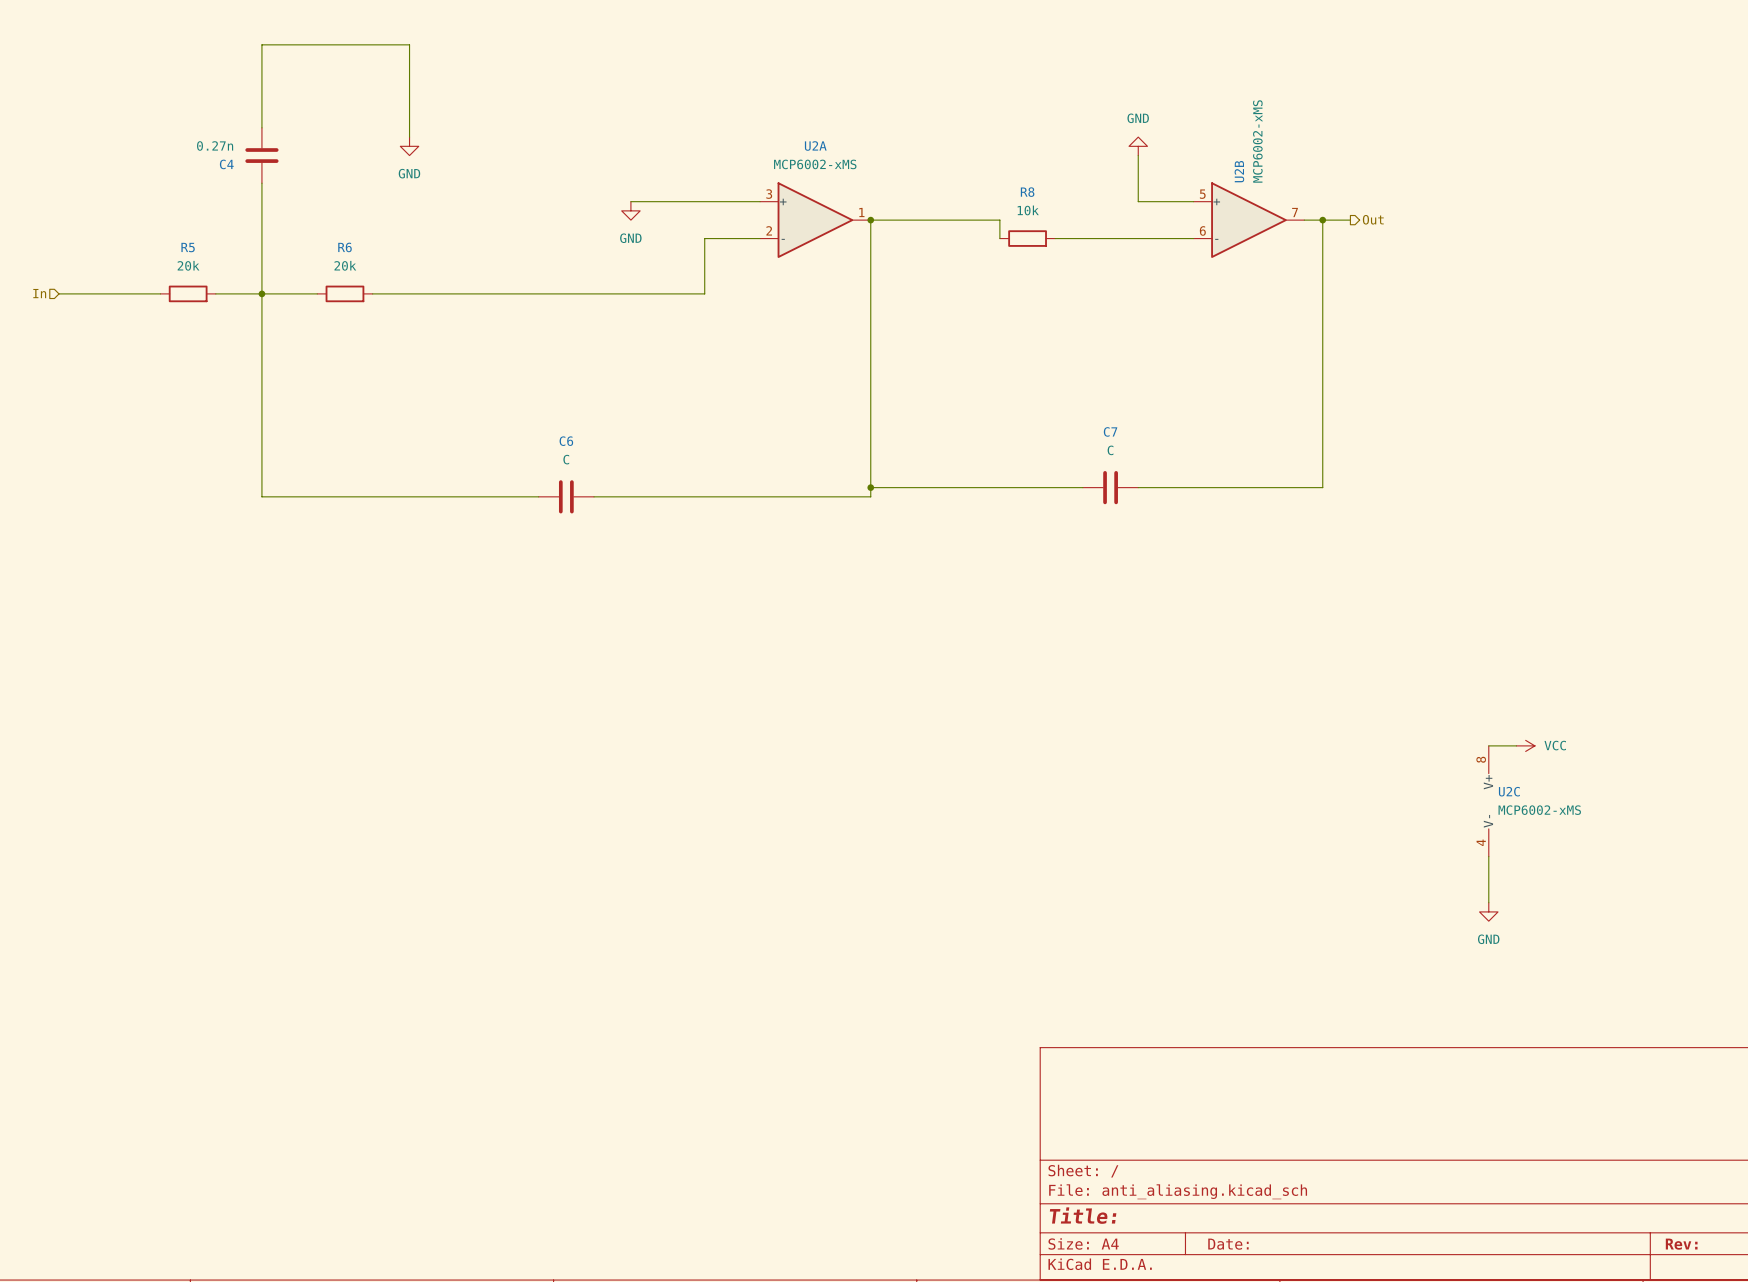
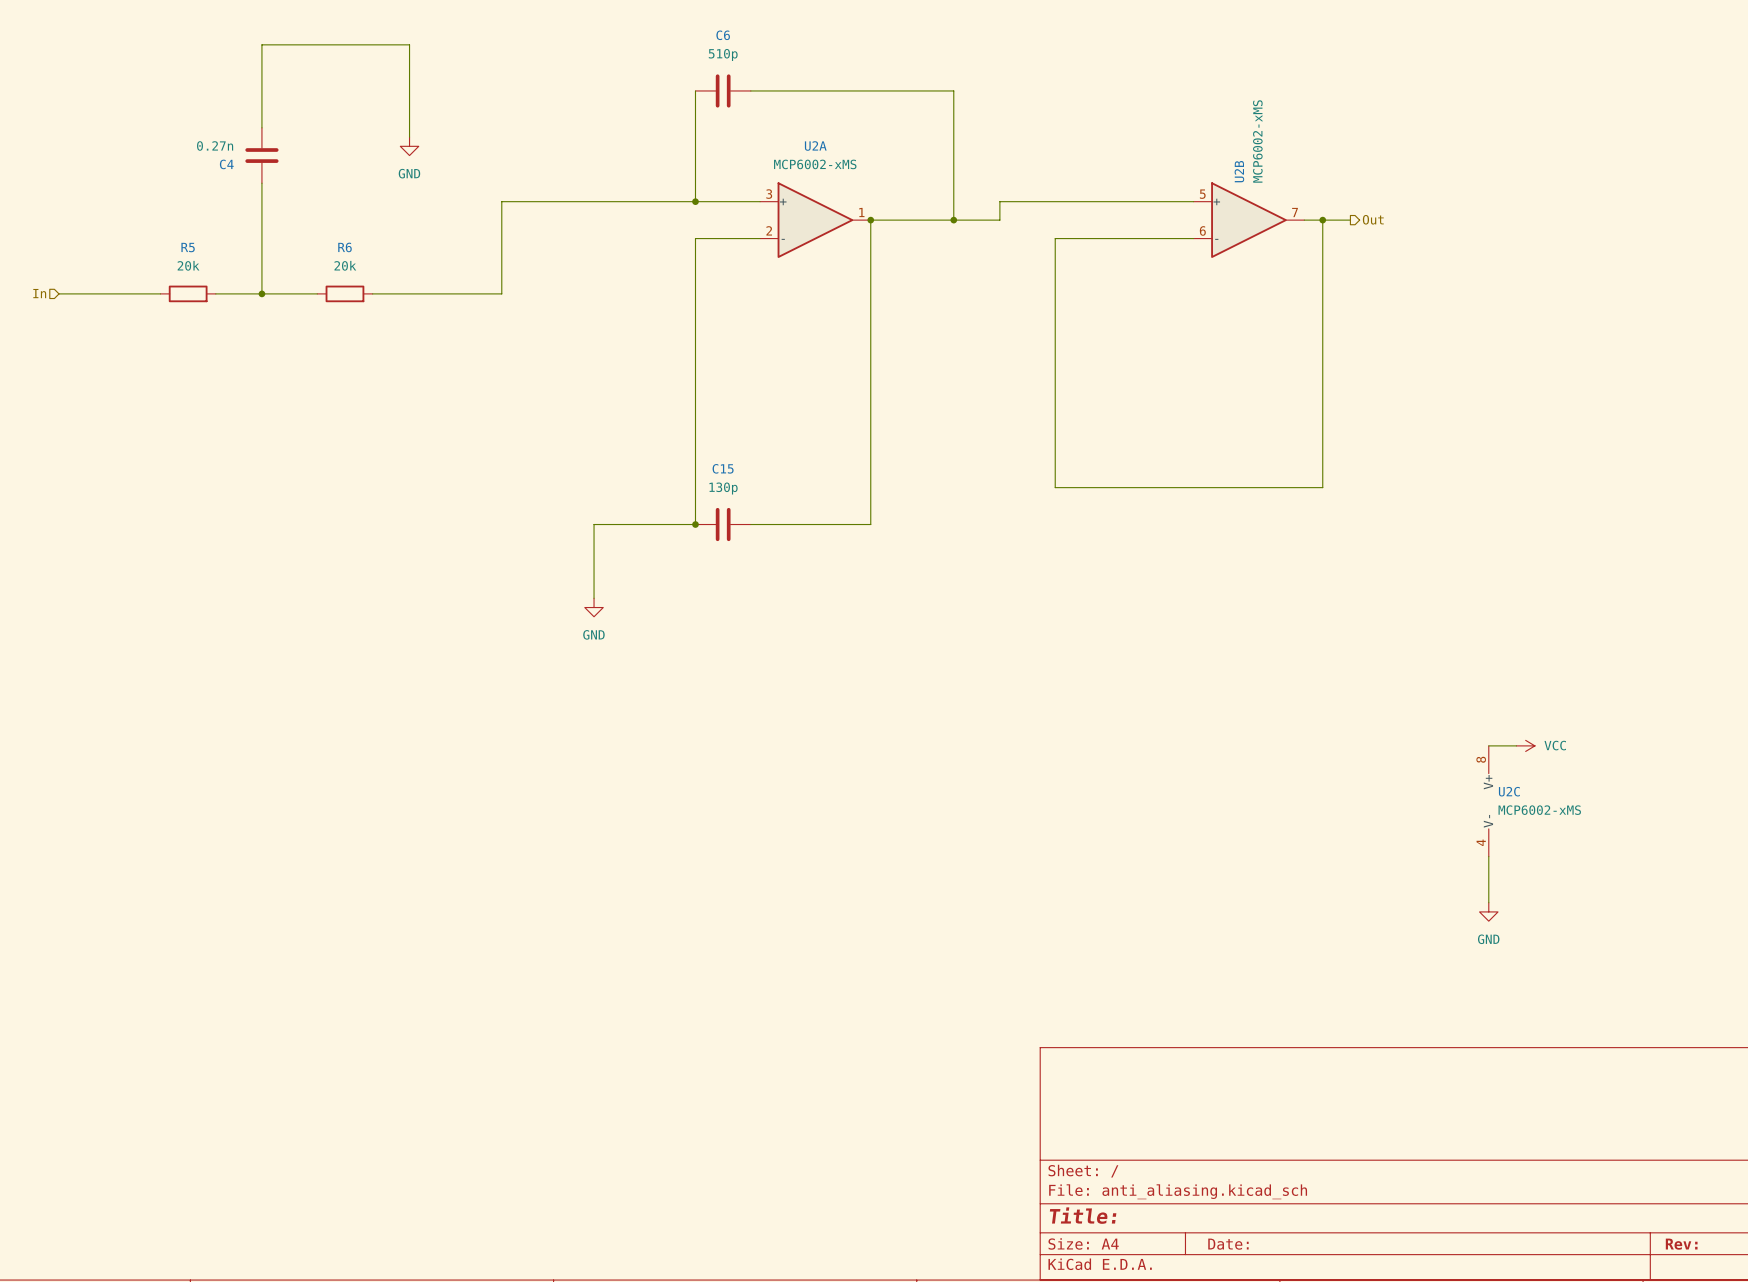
wire: none -> (695, 90) (695, 201)
wire: none -> (750, 90) (953, 90) (953, 220)
power symbol: GND (1138, 146) -> none
wire: (1138, 155) (1138, 201) -> none
junction: none -> (695, 201)
power symbol: GND (630, 210) -> none
junction: none -> (953, 220)
wire: (999, 220) (999, 238) -> (999, 220) (999, 201) (1138, 201)
wire: (704, 238) (704, 293) (501, 293) -> (630, 201) (501, 201) (501, 293)
wire: none -> (704, 238) (695, 238) (695, 524) (594, 524) (594, 598)
R8: 10k (1027, 238) -> none
wire: (261, 293) (261, 496) (538, 496) -> none
C6 value: C (566, 459) -> 510p (723, 54)
wire: (870, 487) (1055, 487) -> (1055, 238) (1055, 487)
junction: (870, 487) -> none
C7: C (1110, 487) -> none
C6 position: (566, 496) -> (723, 90)
wire: (594, 496) (870, 496) -> (750, 524) (870, 524) (870, 496)
junction: none -> (695, 524)
C15: none -> 130p (723, 524)
power symbol: none -> GND (594, 607)

